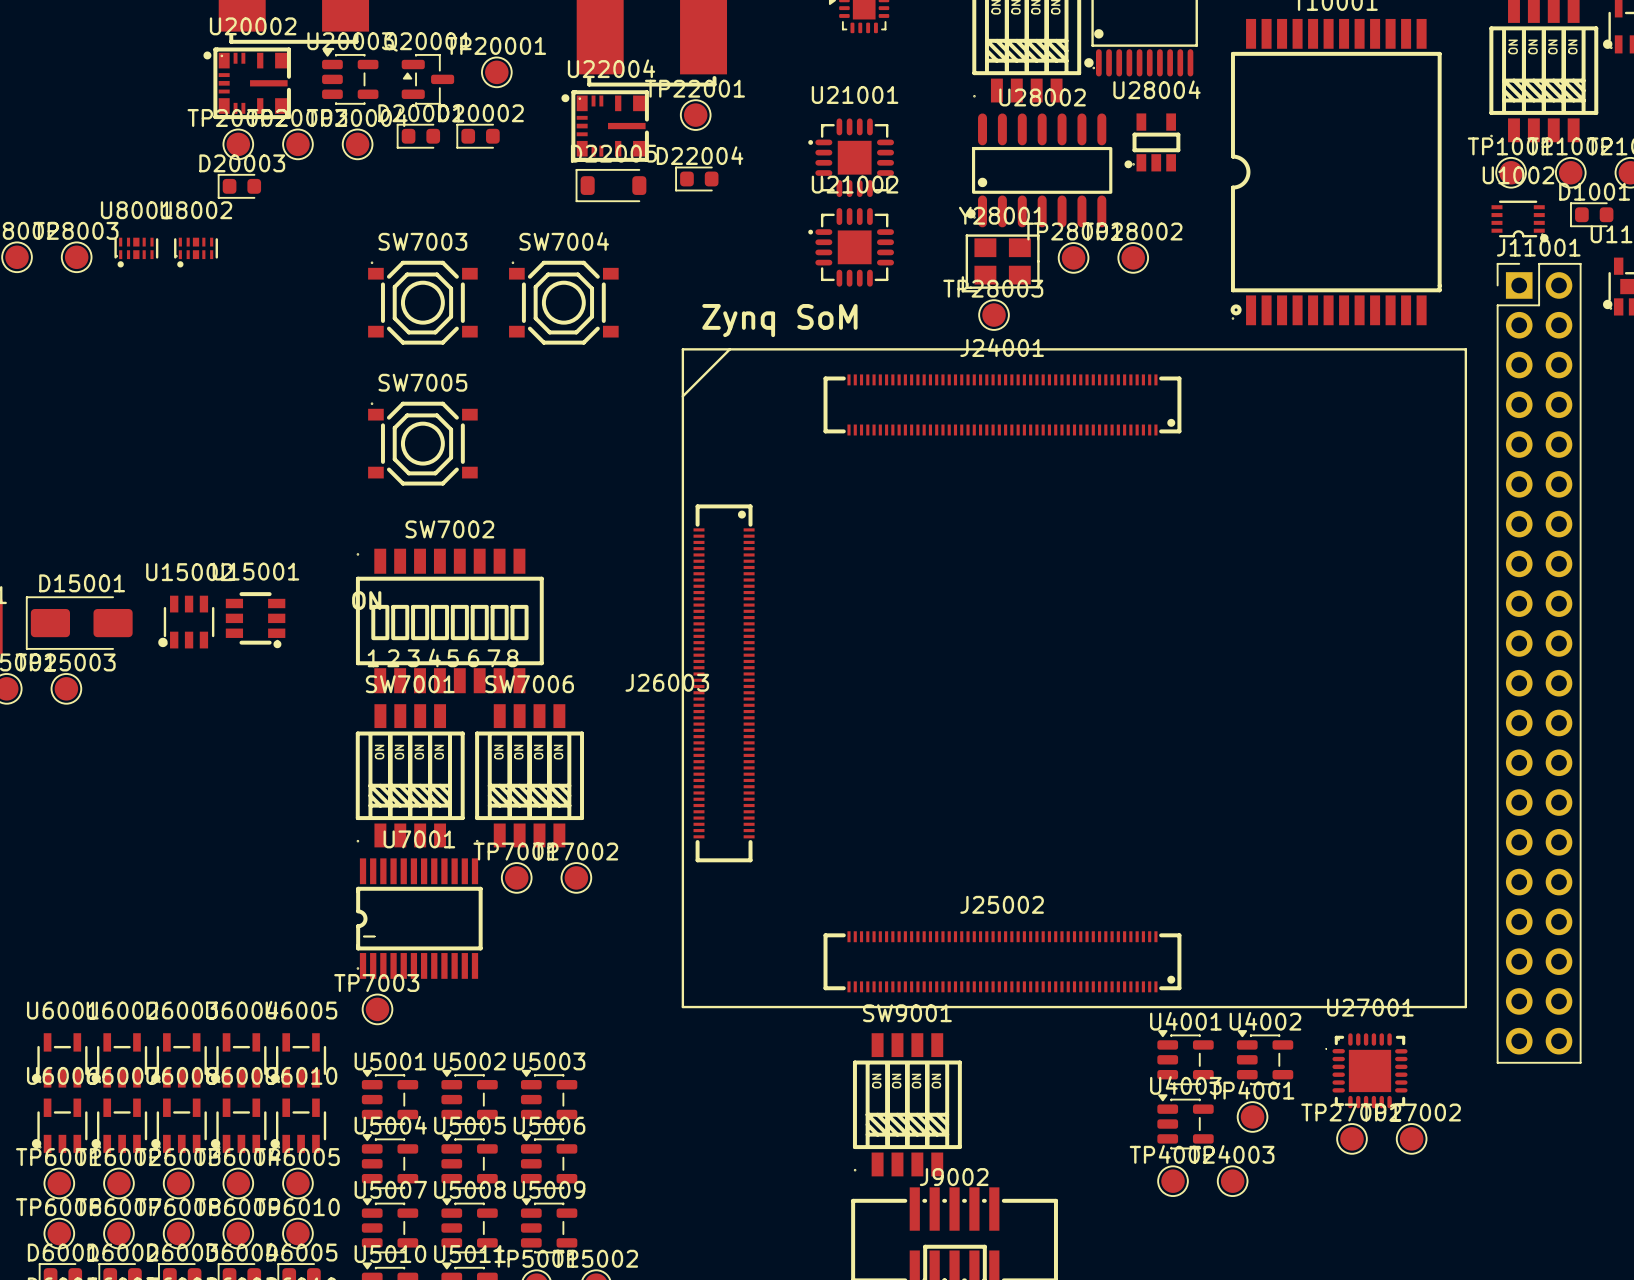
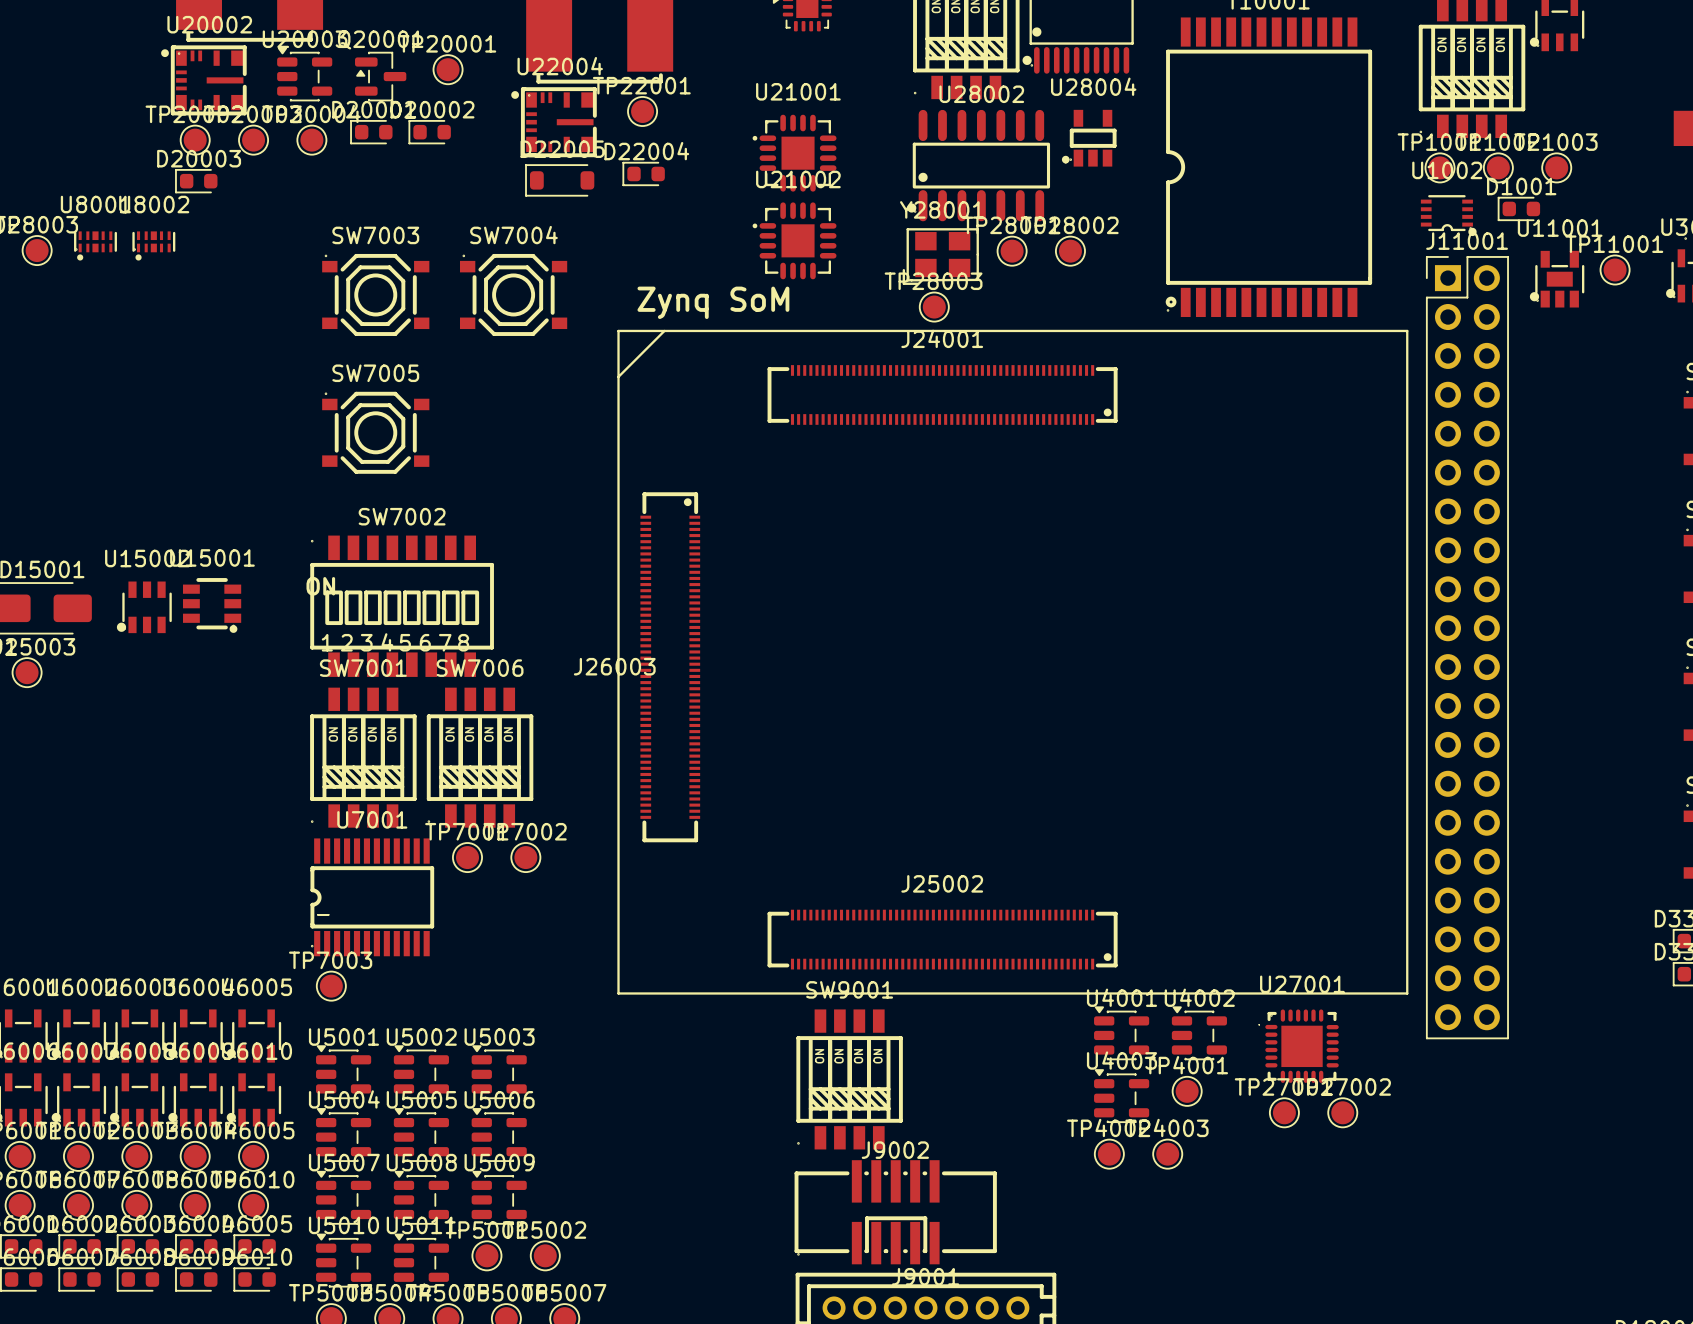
text position: Zynq SoM (779, 320) -> Zynq SoM (713, 302)
line: (682, 349) (1465, 349) (1465, 1007) (682, 1007) (682, 349) -> (618, 330) (618, 993) (1407, 993) (1407, 330) (618, 330)
line: (729, 349) (682, 396) -> (664, 330) (618, 376)

